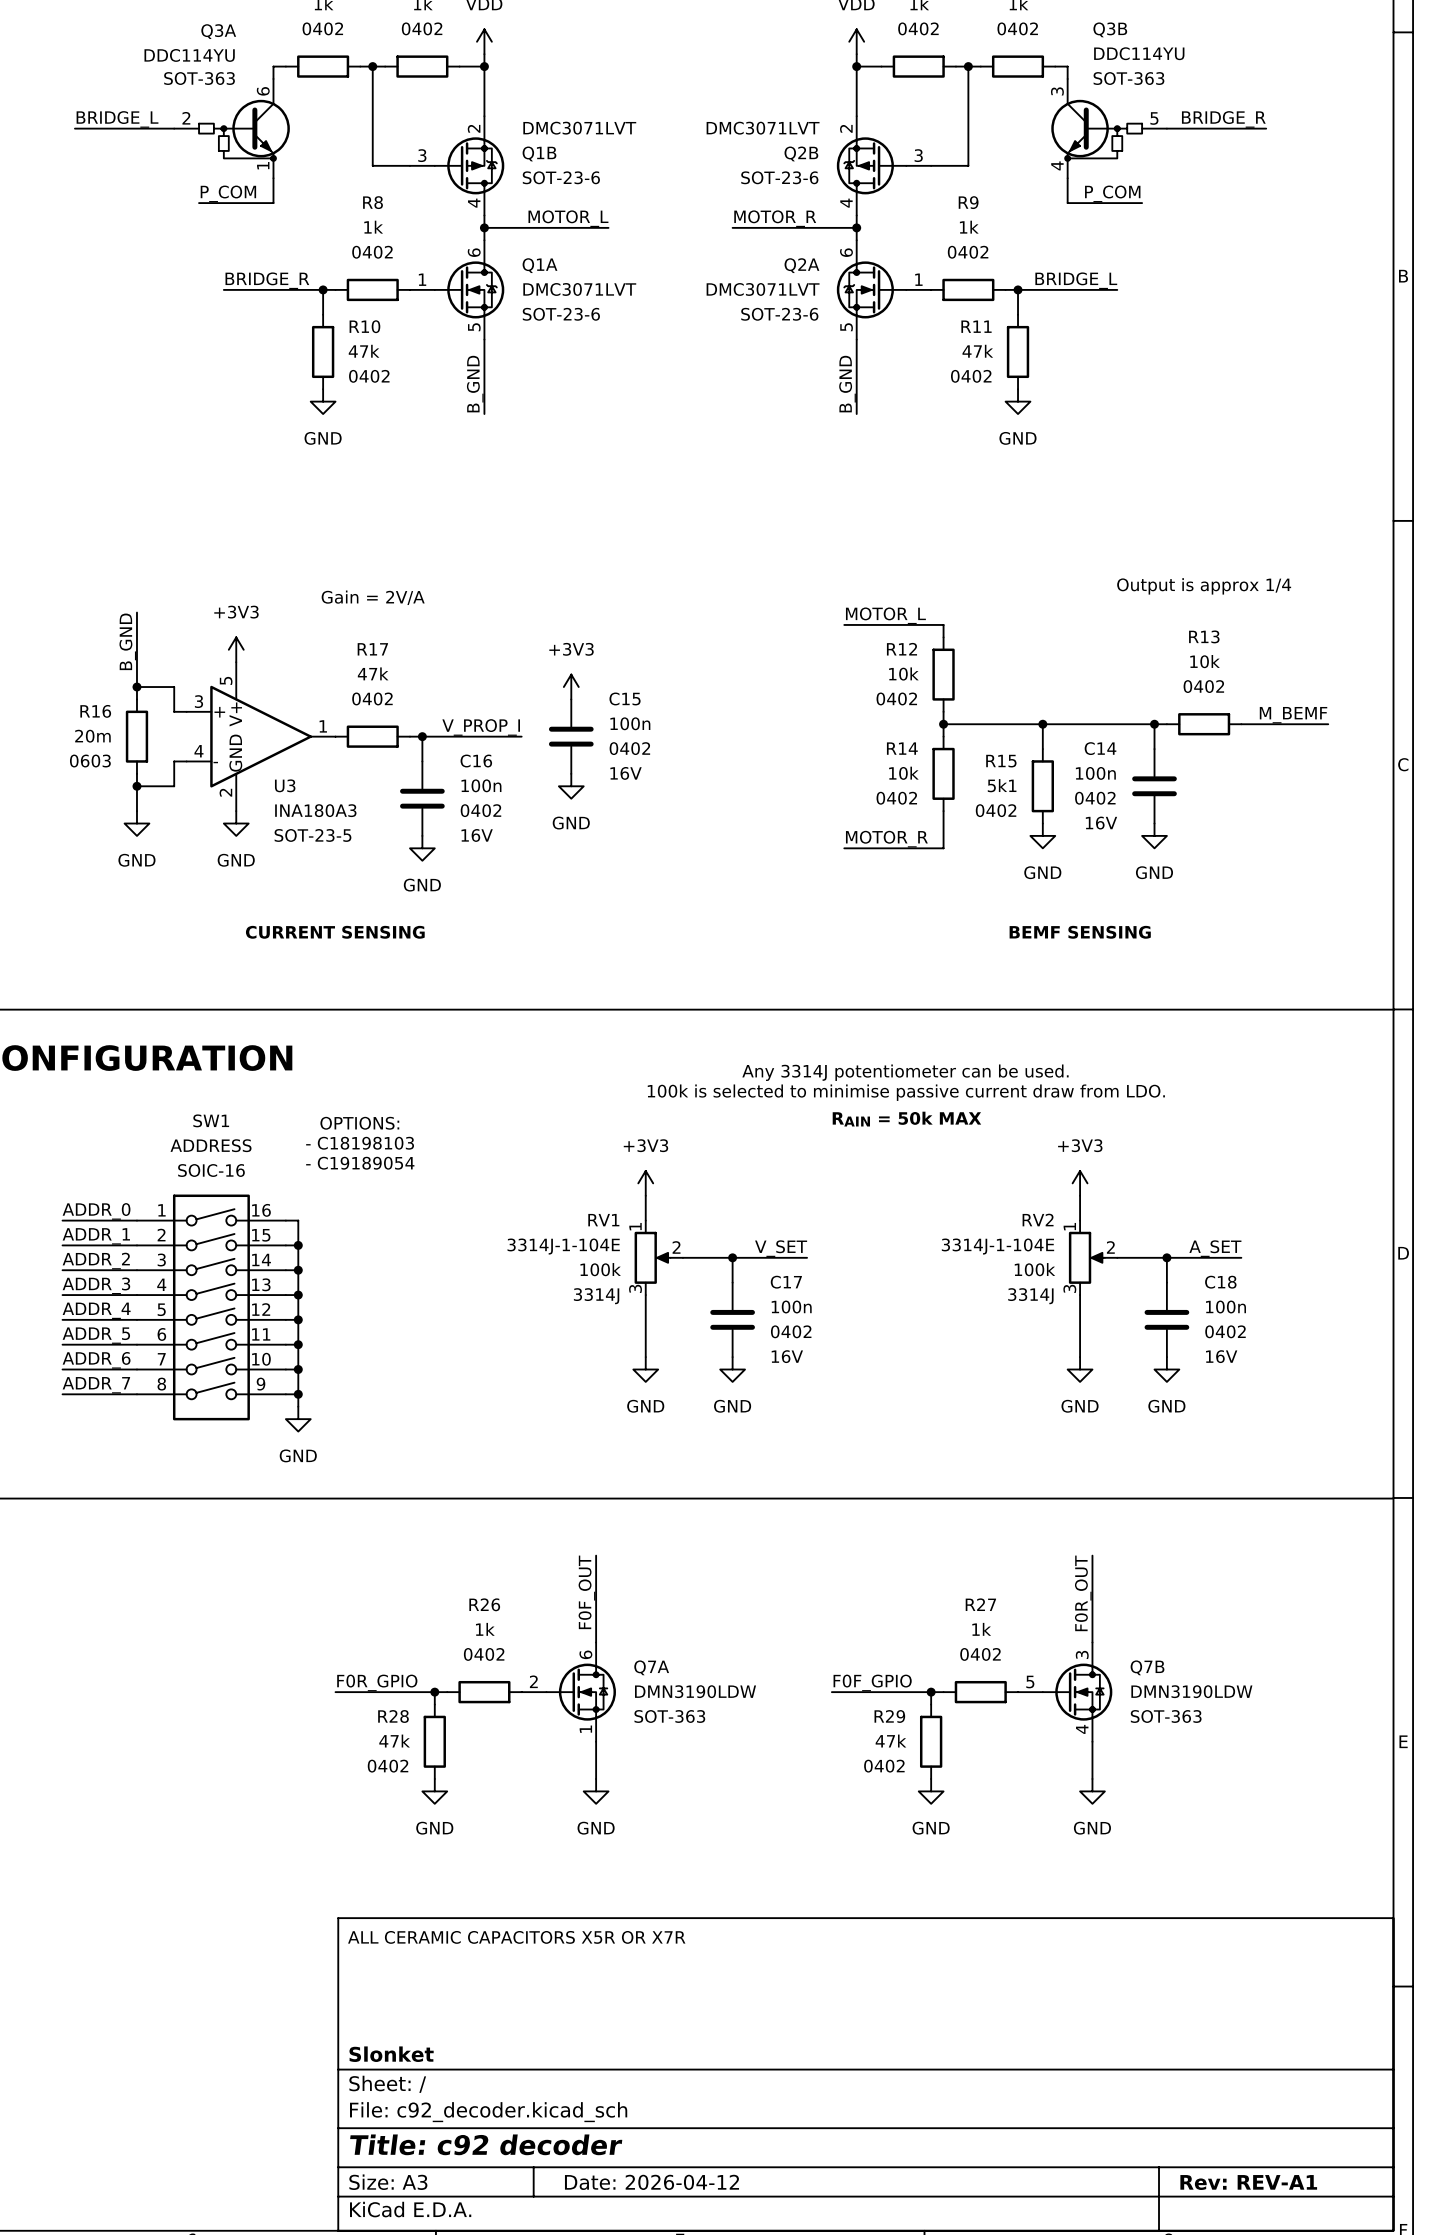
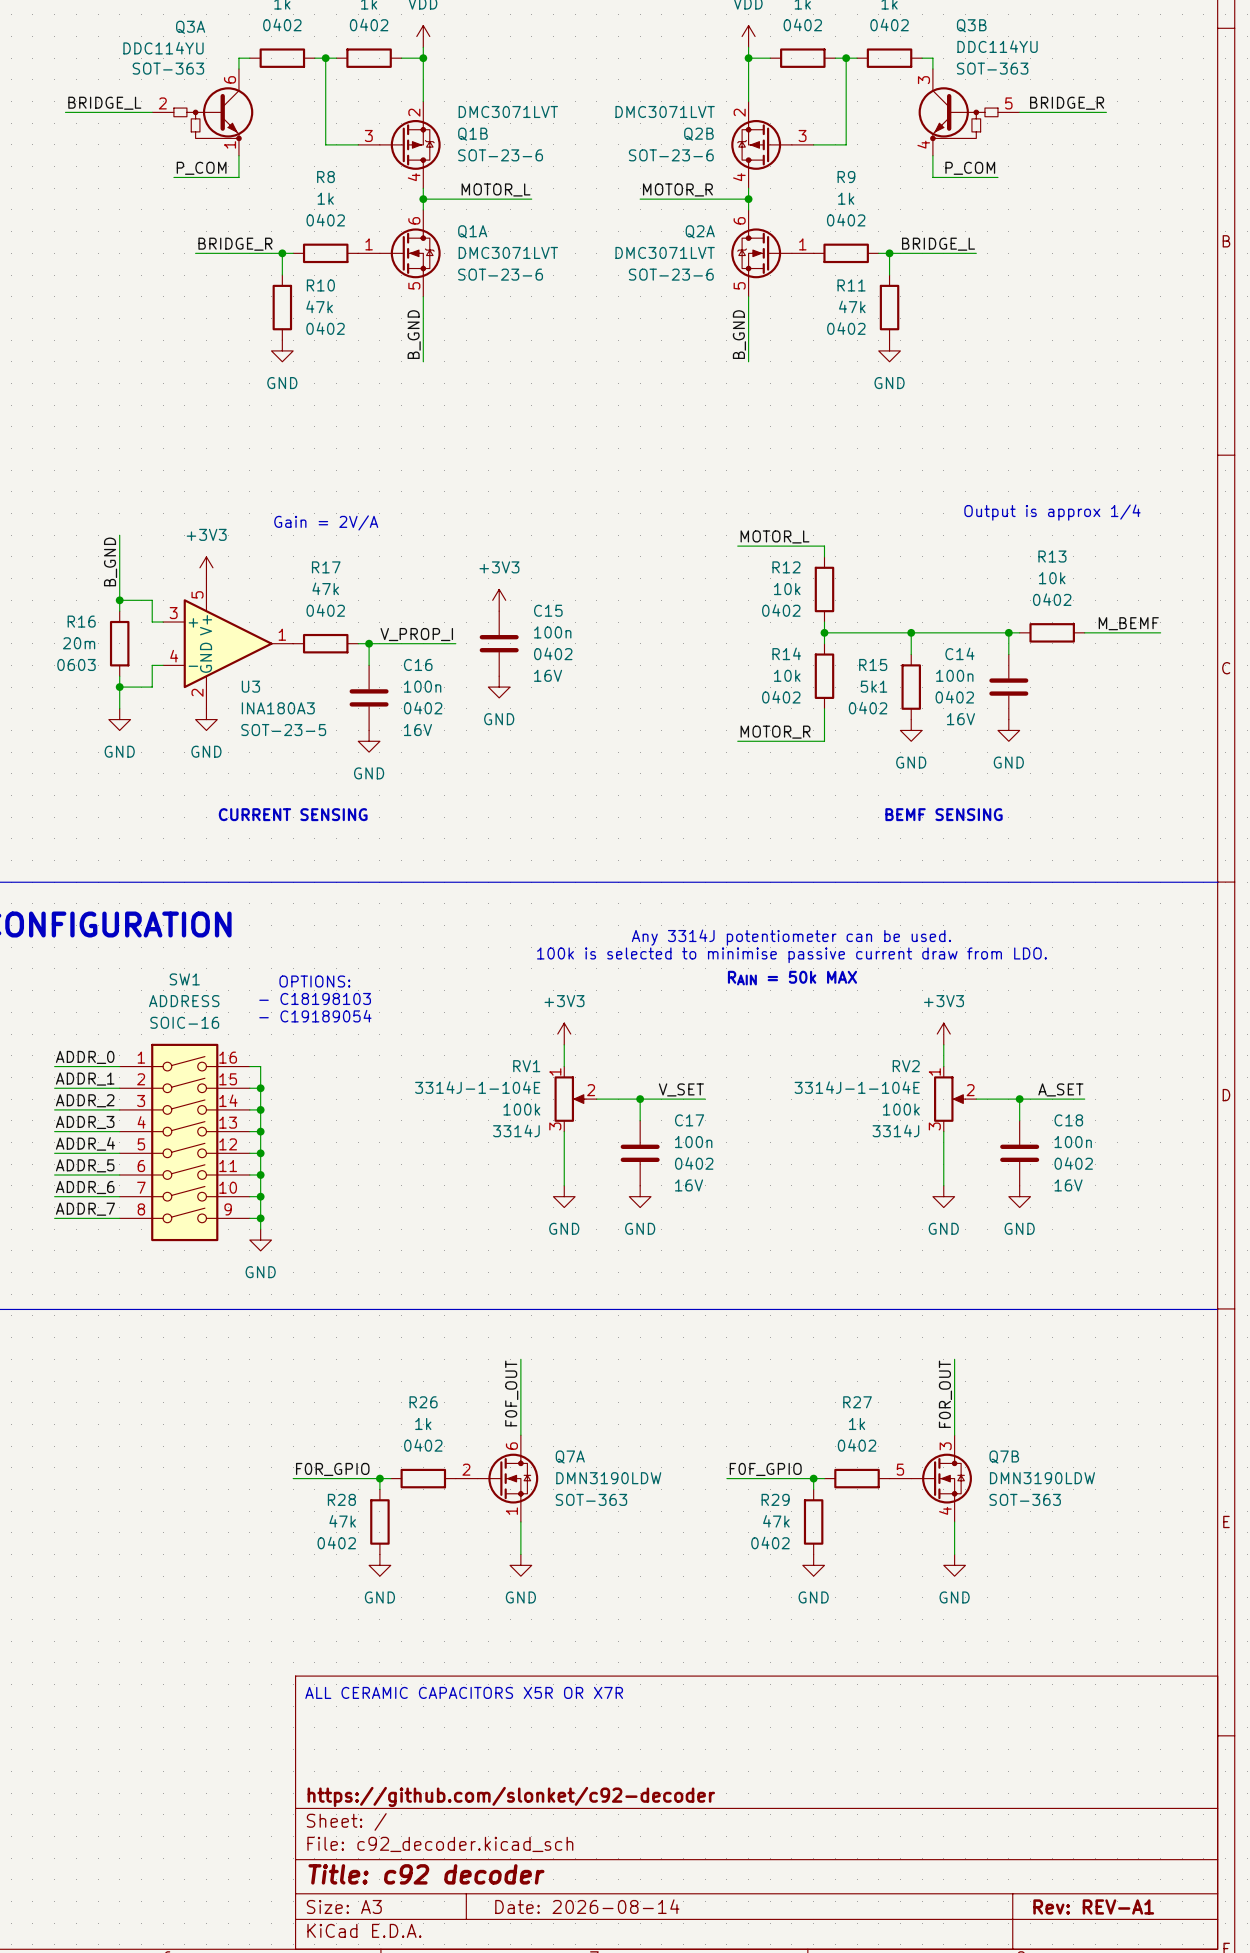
title block: Slonket (391, 2054) -> https://github.com/slonket/c92-decoder (511, 1796)
title block: Date: 2026-04-12 (651, 2182) -> Date: 2026-08-14 (587, 1906)

